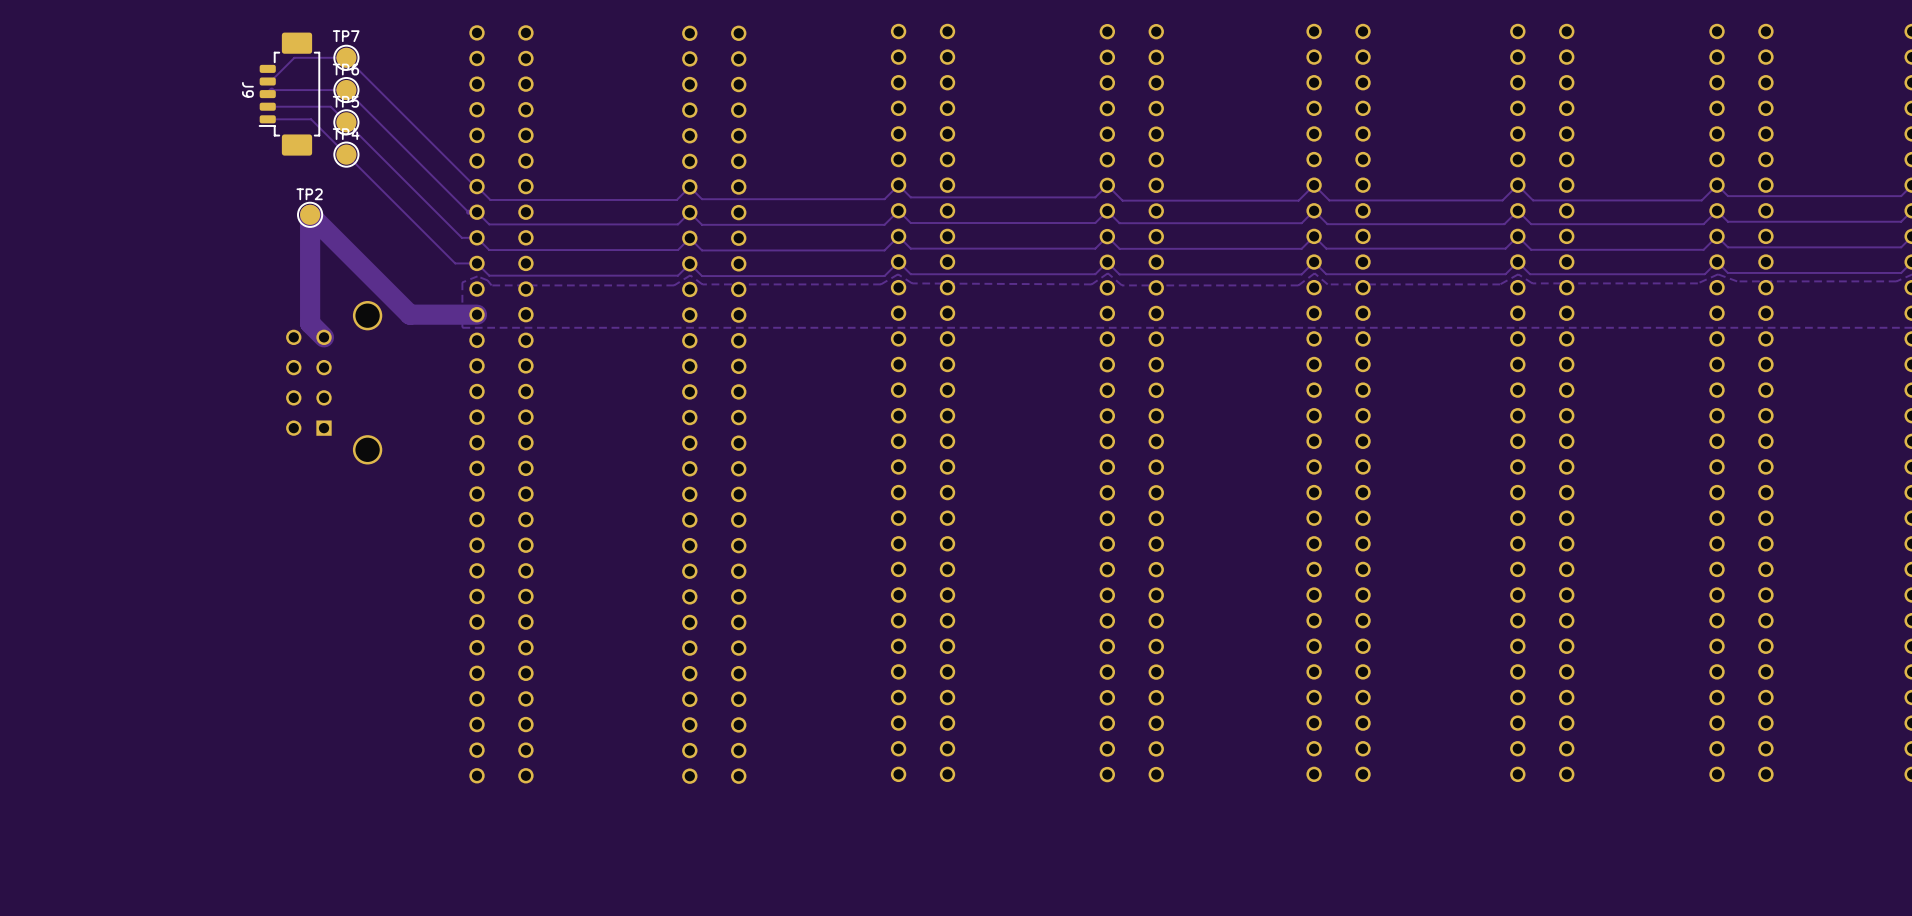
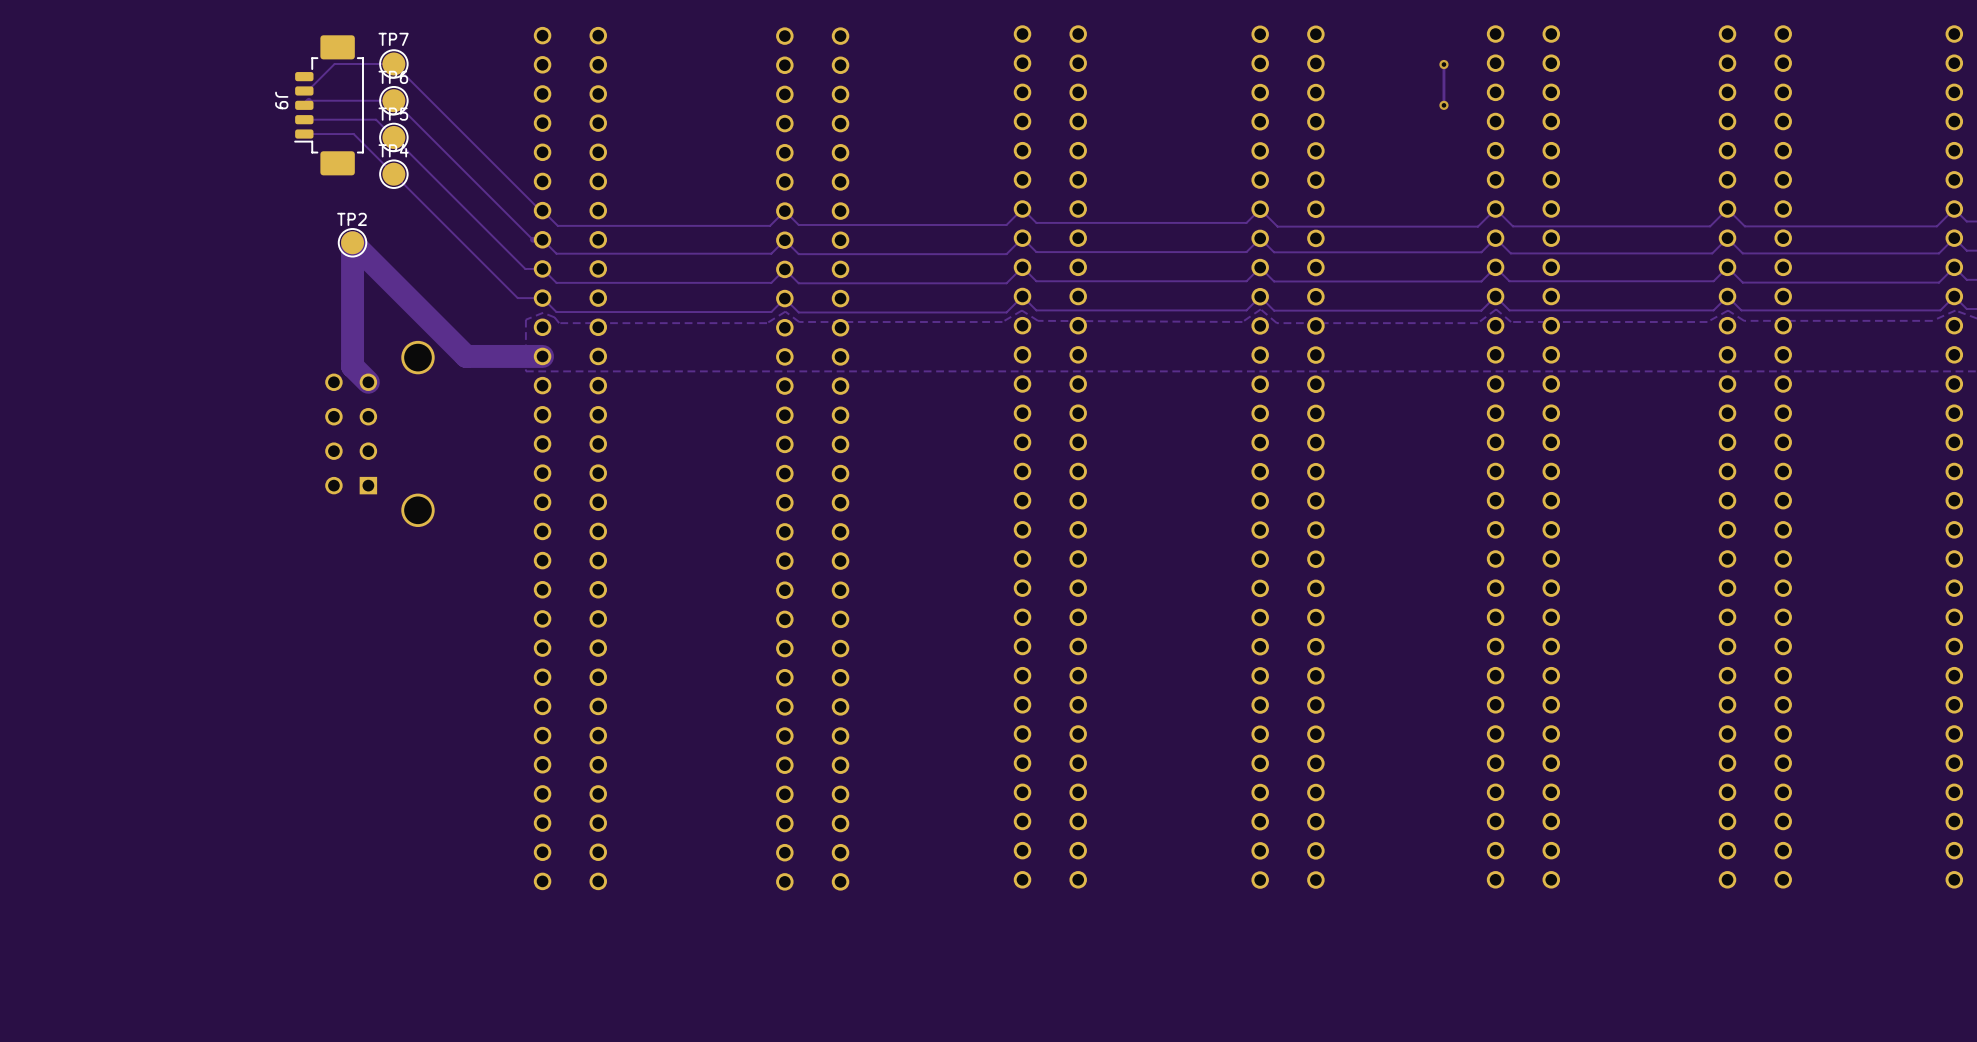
track: none -> (1443, 64) (1443, 105)
via: none -> (1443, 64)
via: none -> (1443, 105)

